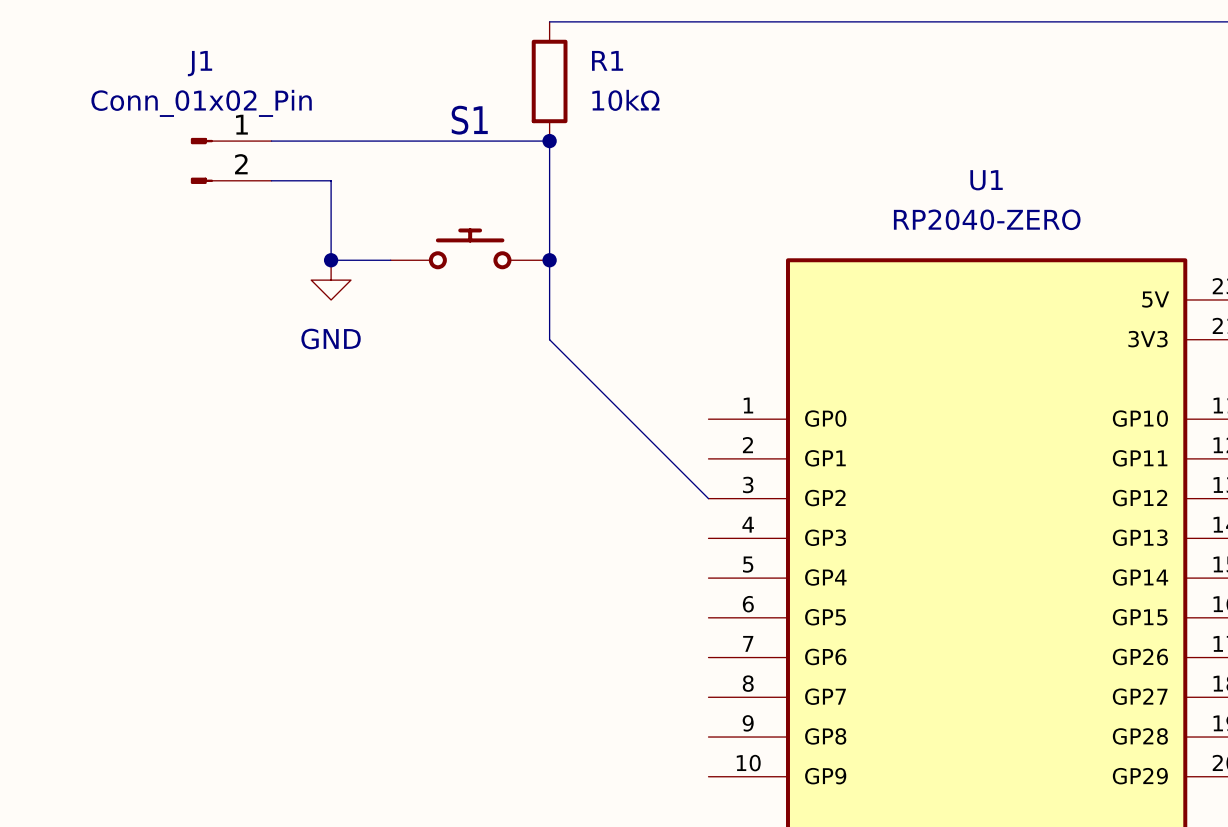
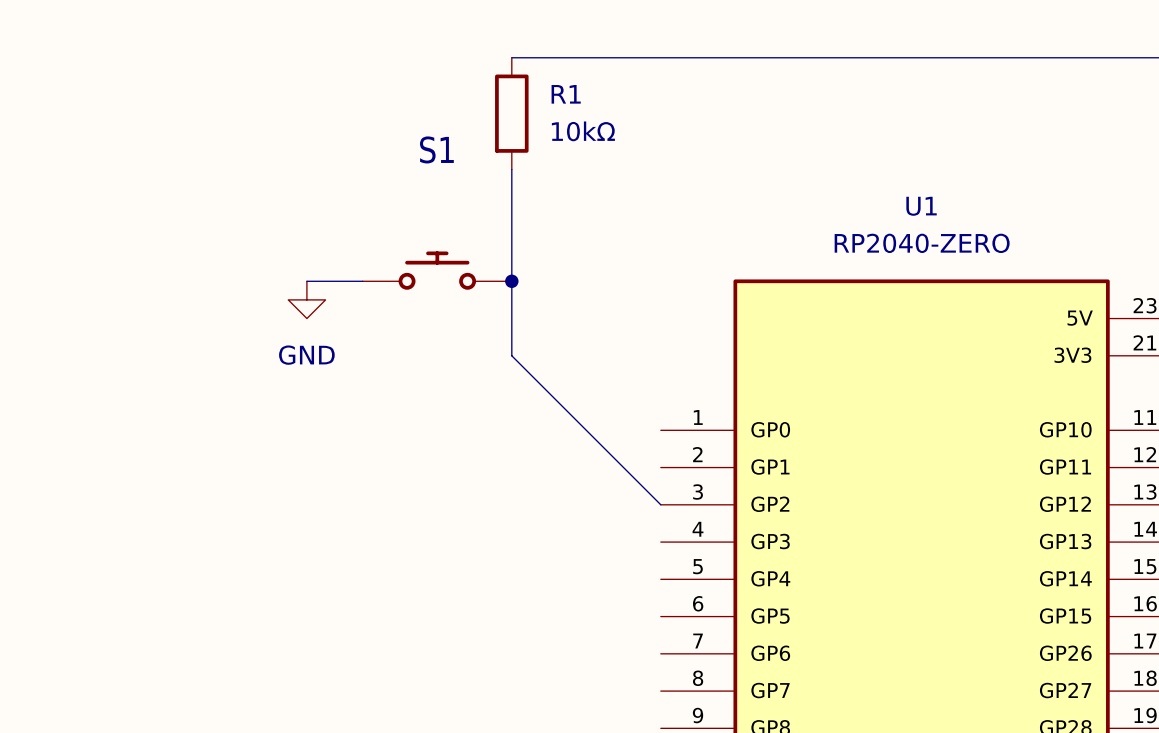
wire: (271, 141) (549, 141) -> none
junction: (549, 141) -> none
J1: Conn_01x02_Pin (231, 160) -> none
wire: (271, 180) (331, 180) (331, 260) -> none
junction: (331, 260) -> none

